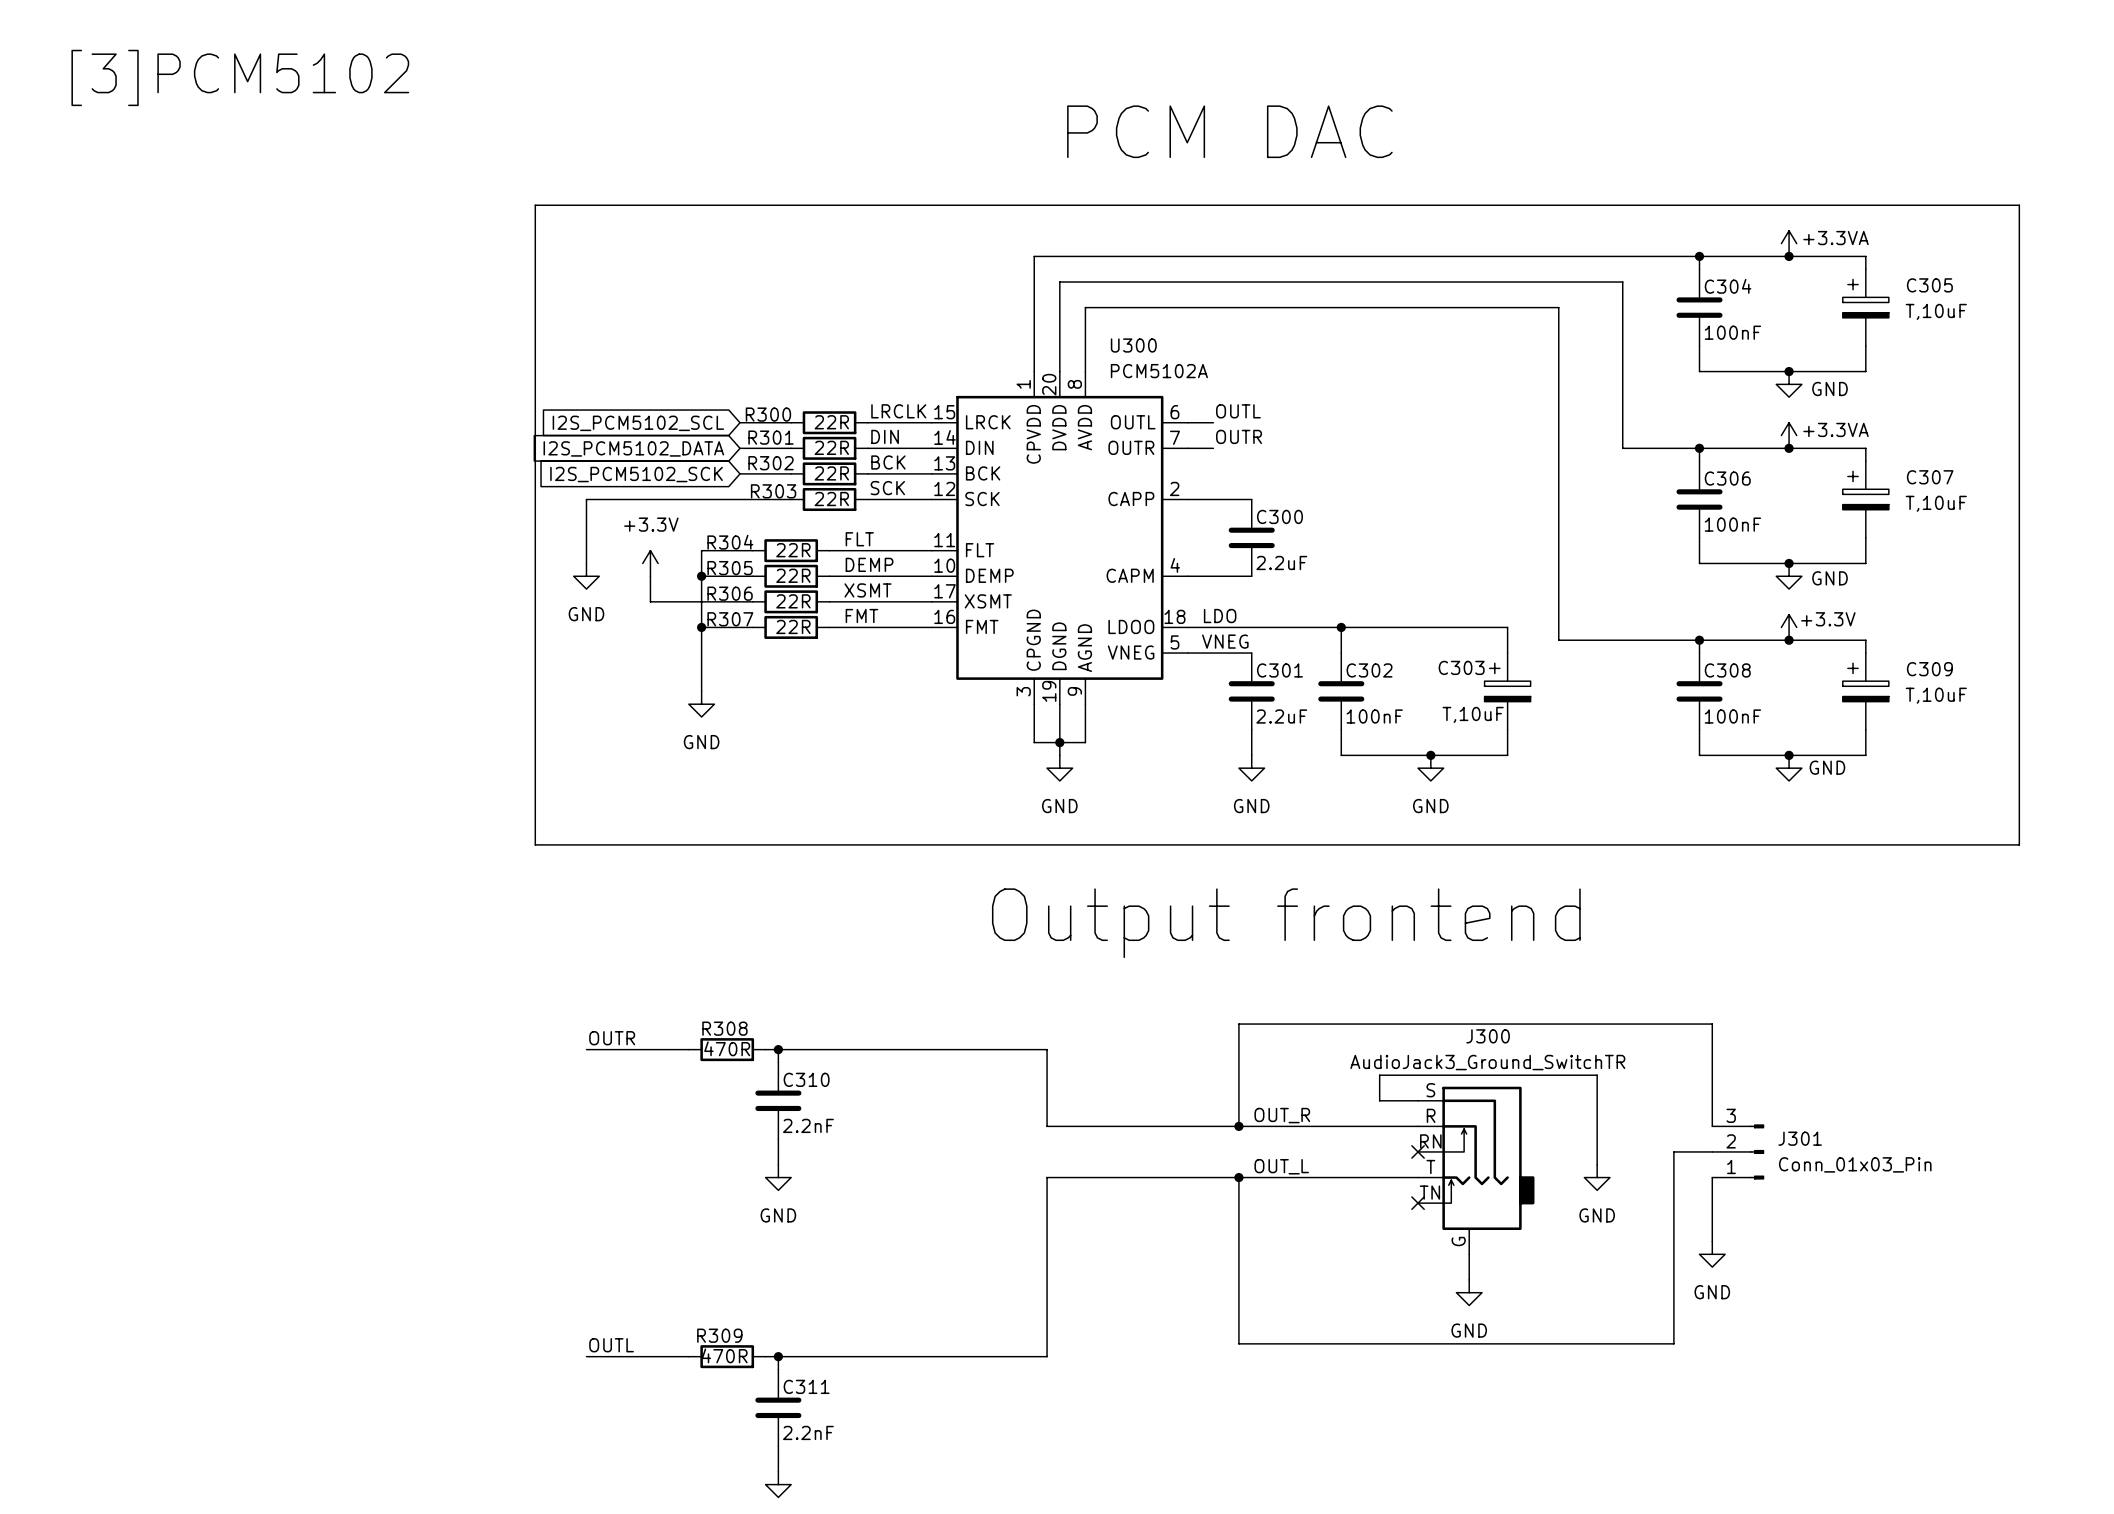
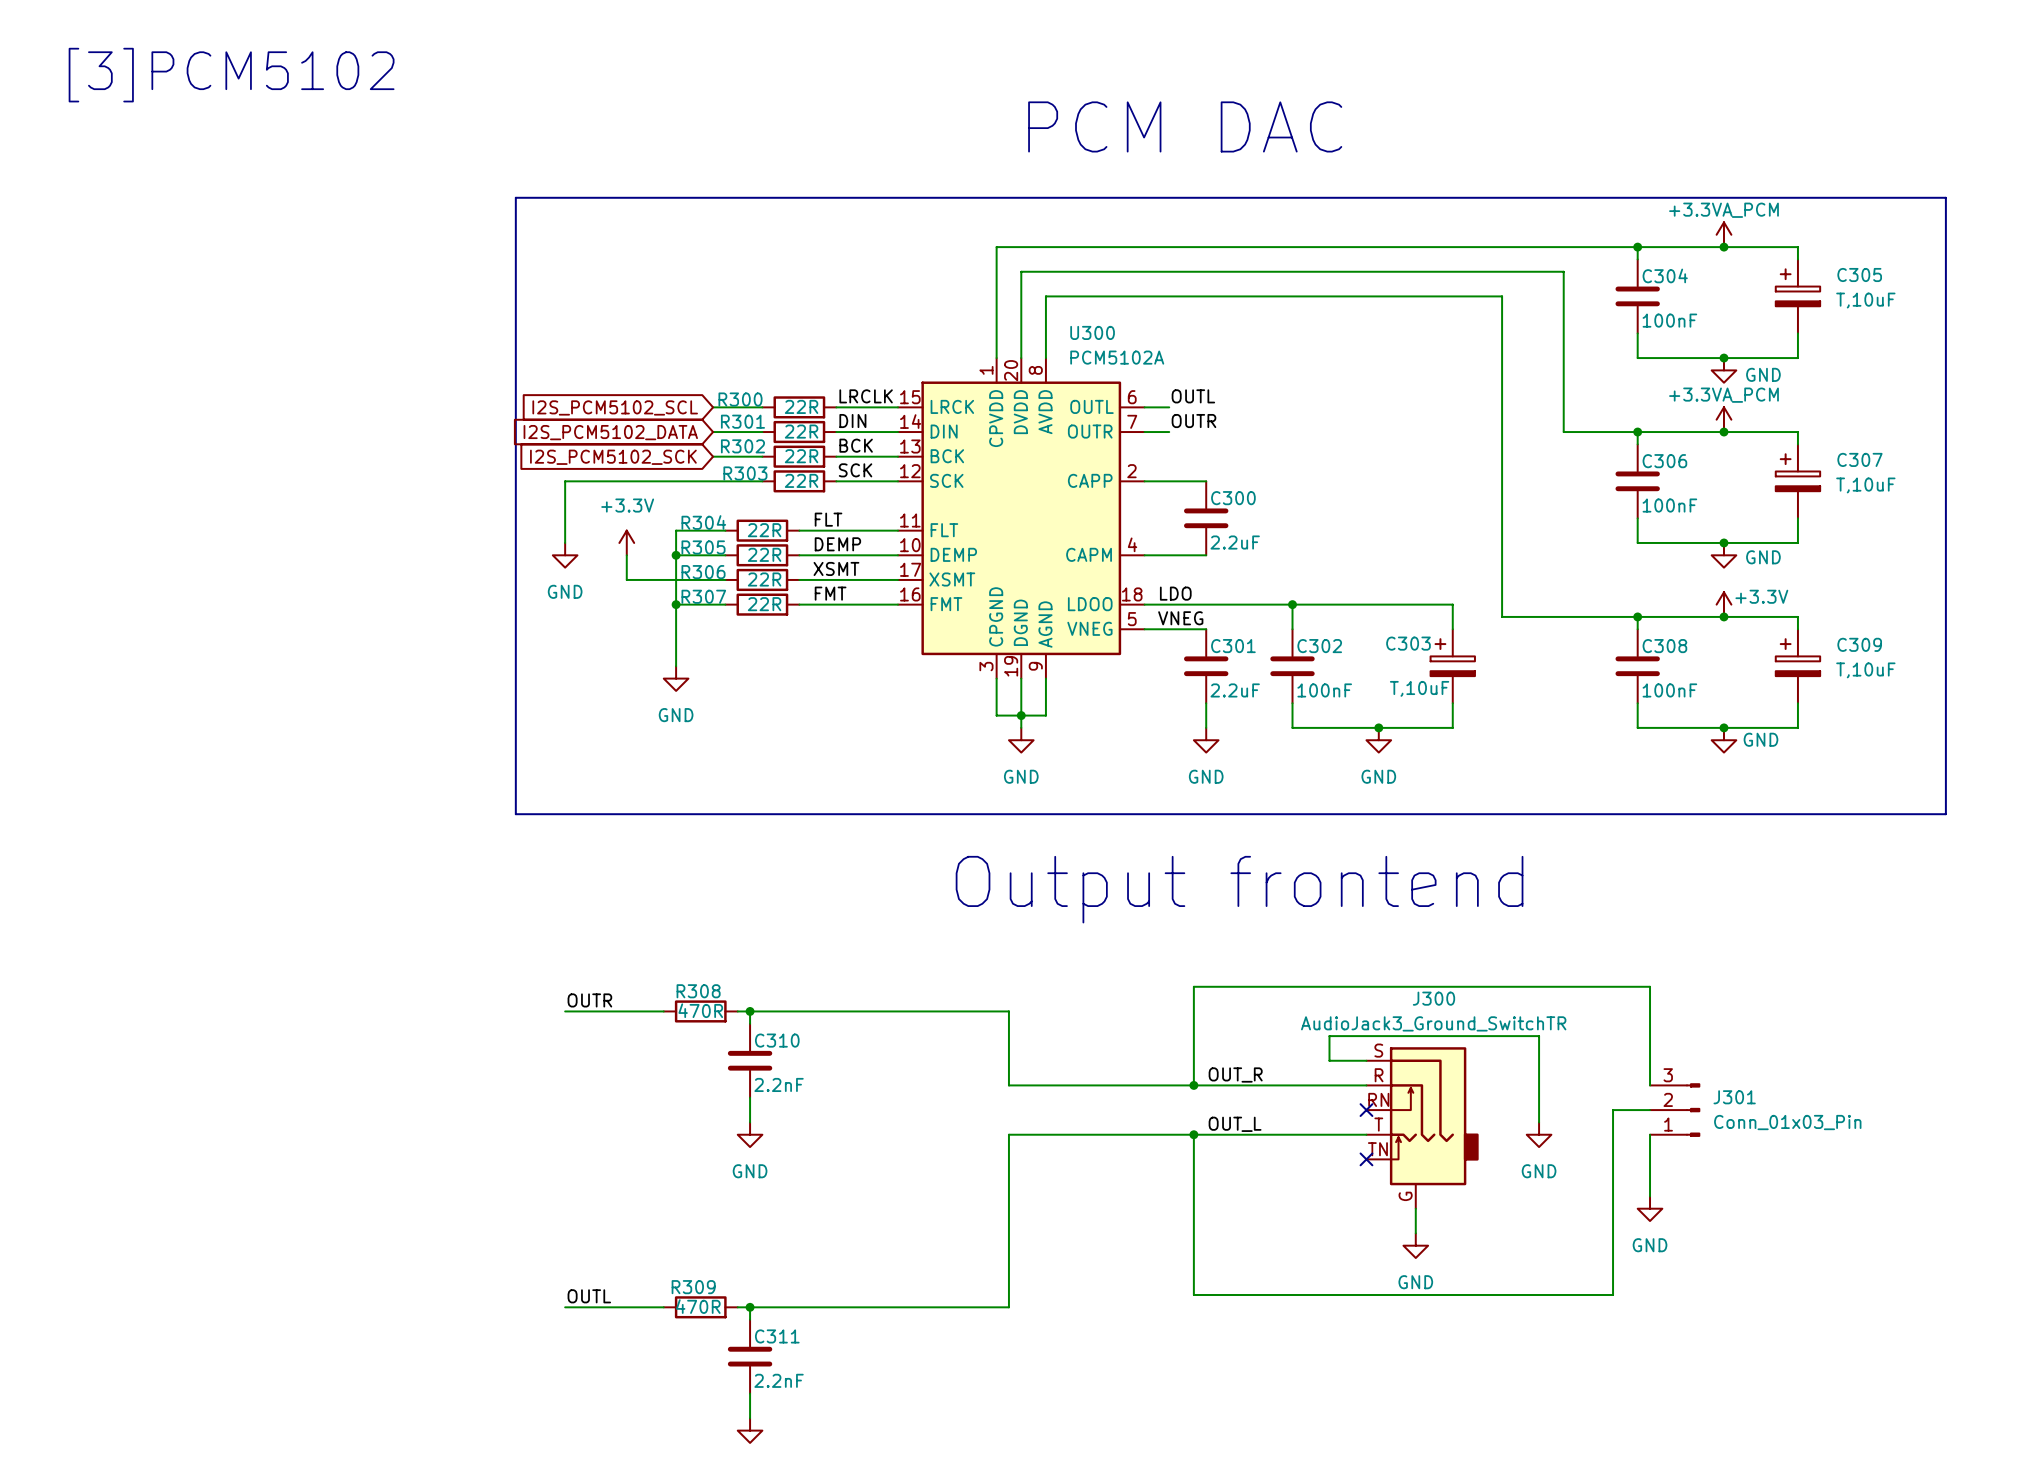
power symbol: +3.3VA (1789, 243) -> +3.3VA_PCM (1723, 234)
power symbol: +3.3VA (1789, 435) -> +3.3VA_PCM (1723, 419)

